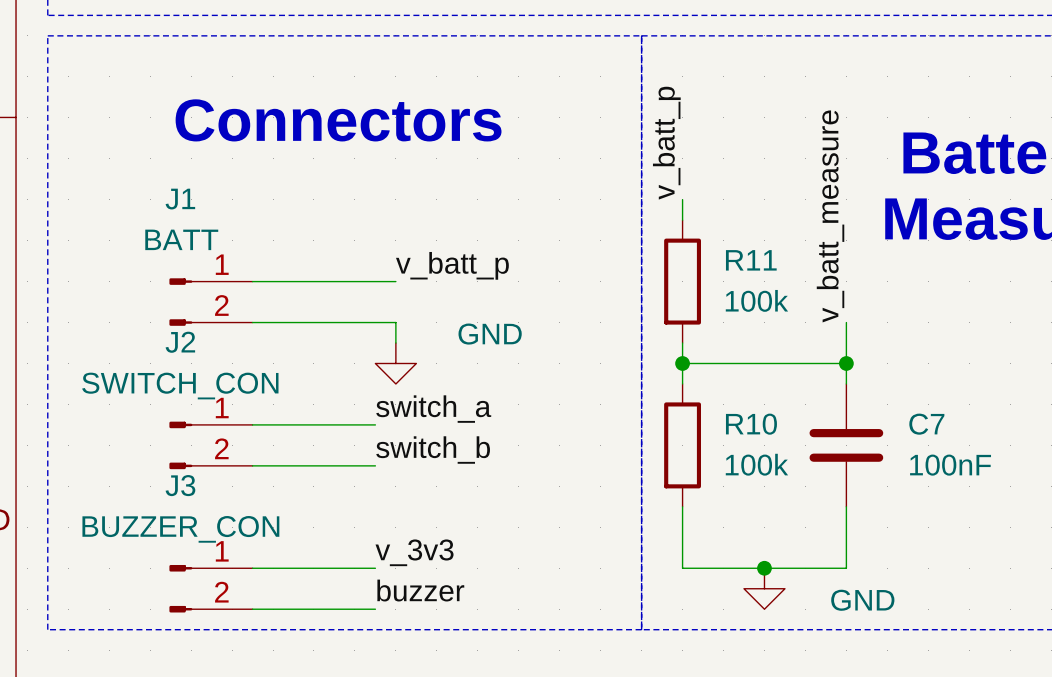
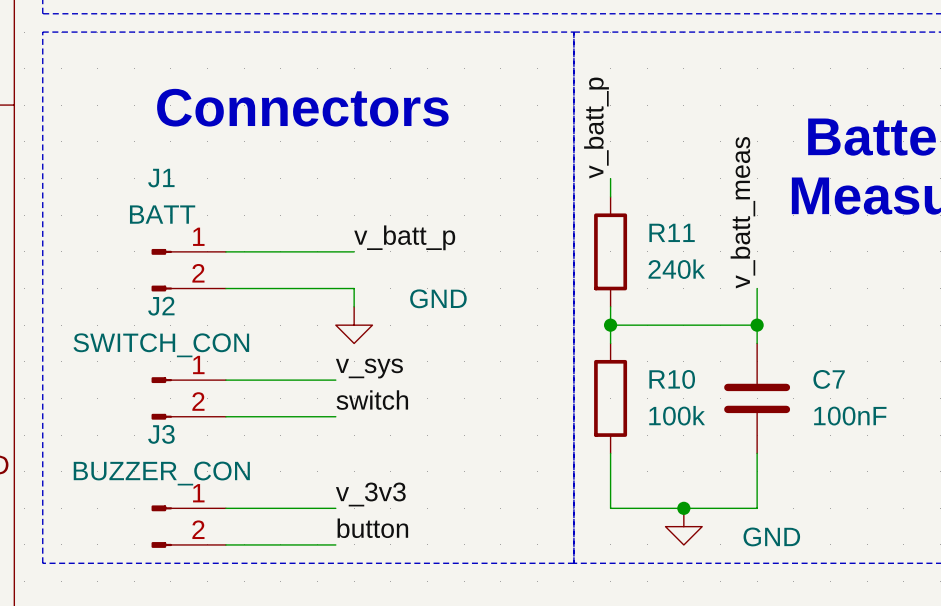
label: v_batt_measure (830, 216) -> v_batt_meas (742, 212)
R11 value: 100k (756, 300) -> 240k (676, 269)
label: switch_a (433, 409) -> v_sys (369, 368)
label: switch_b (433, 450) -> switch (372, 400)
label: buzzer (420, 590) -> button (372, 528)

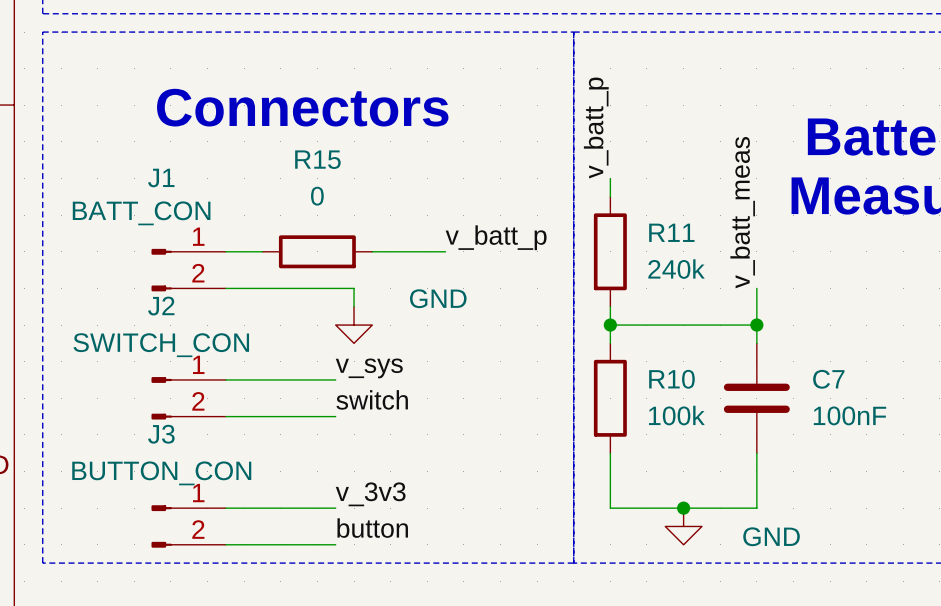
J1 value: BATT (162, 214) -> BATT_CON (141, 213)
label position: v_batt_p (404, 237) -> v_batt_p (496, 237)
wire: (262, 251) (354, 251) -> none
R15: none -> 0 (317, 251)
wire: none -> (372, 251) (445, 251)
J3 value: BUZZER_CON (161, 473) -> BUTTON_CON (161, 473)

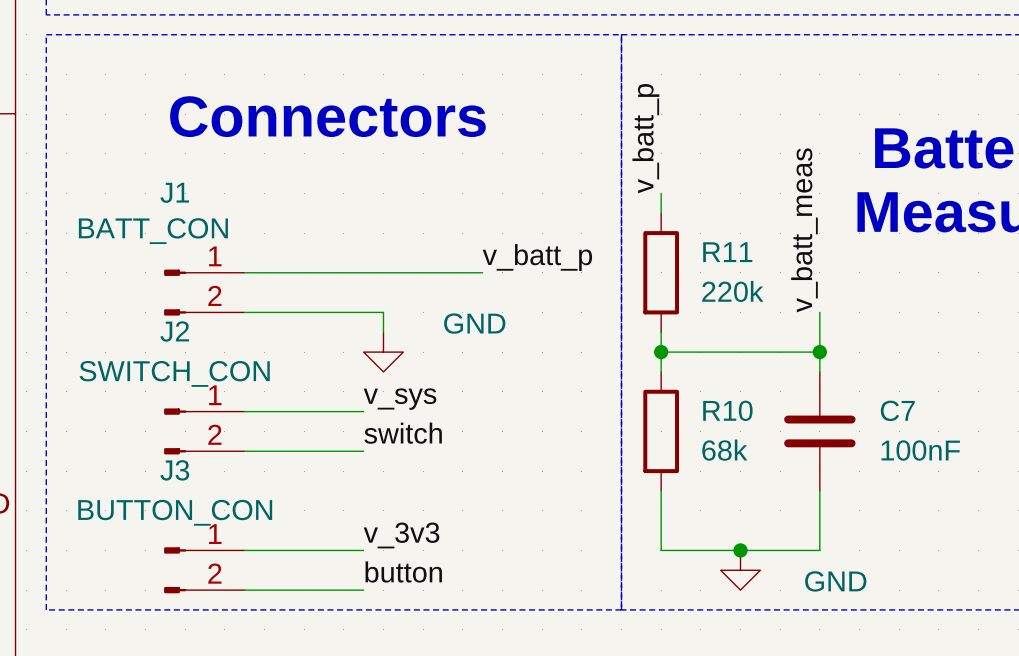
wire: none -> (284, 272) (403, 272)
R15: 0 (317, 251) -> none
R11 value: 240k (676, 269) -> 220k (732, 291)
R10 value: 100k (676, 415) -> 68k (724, 450)

